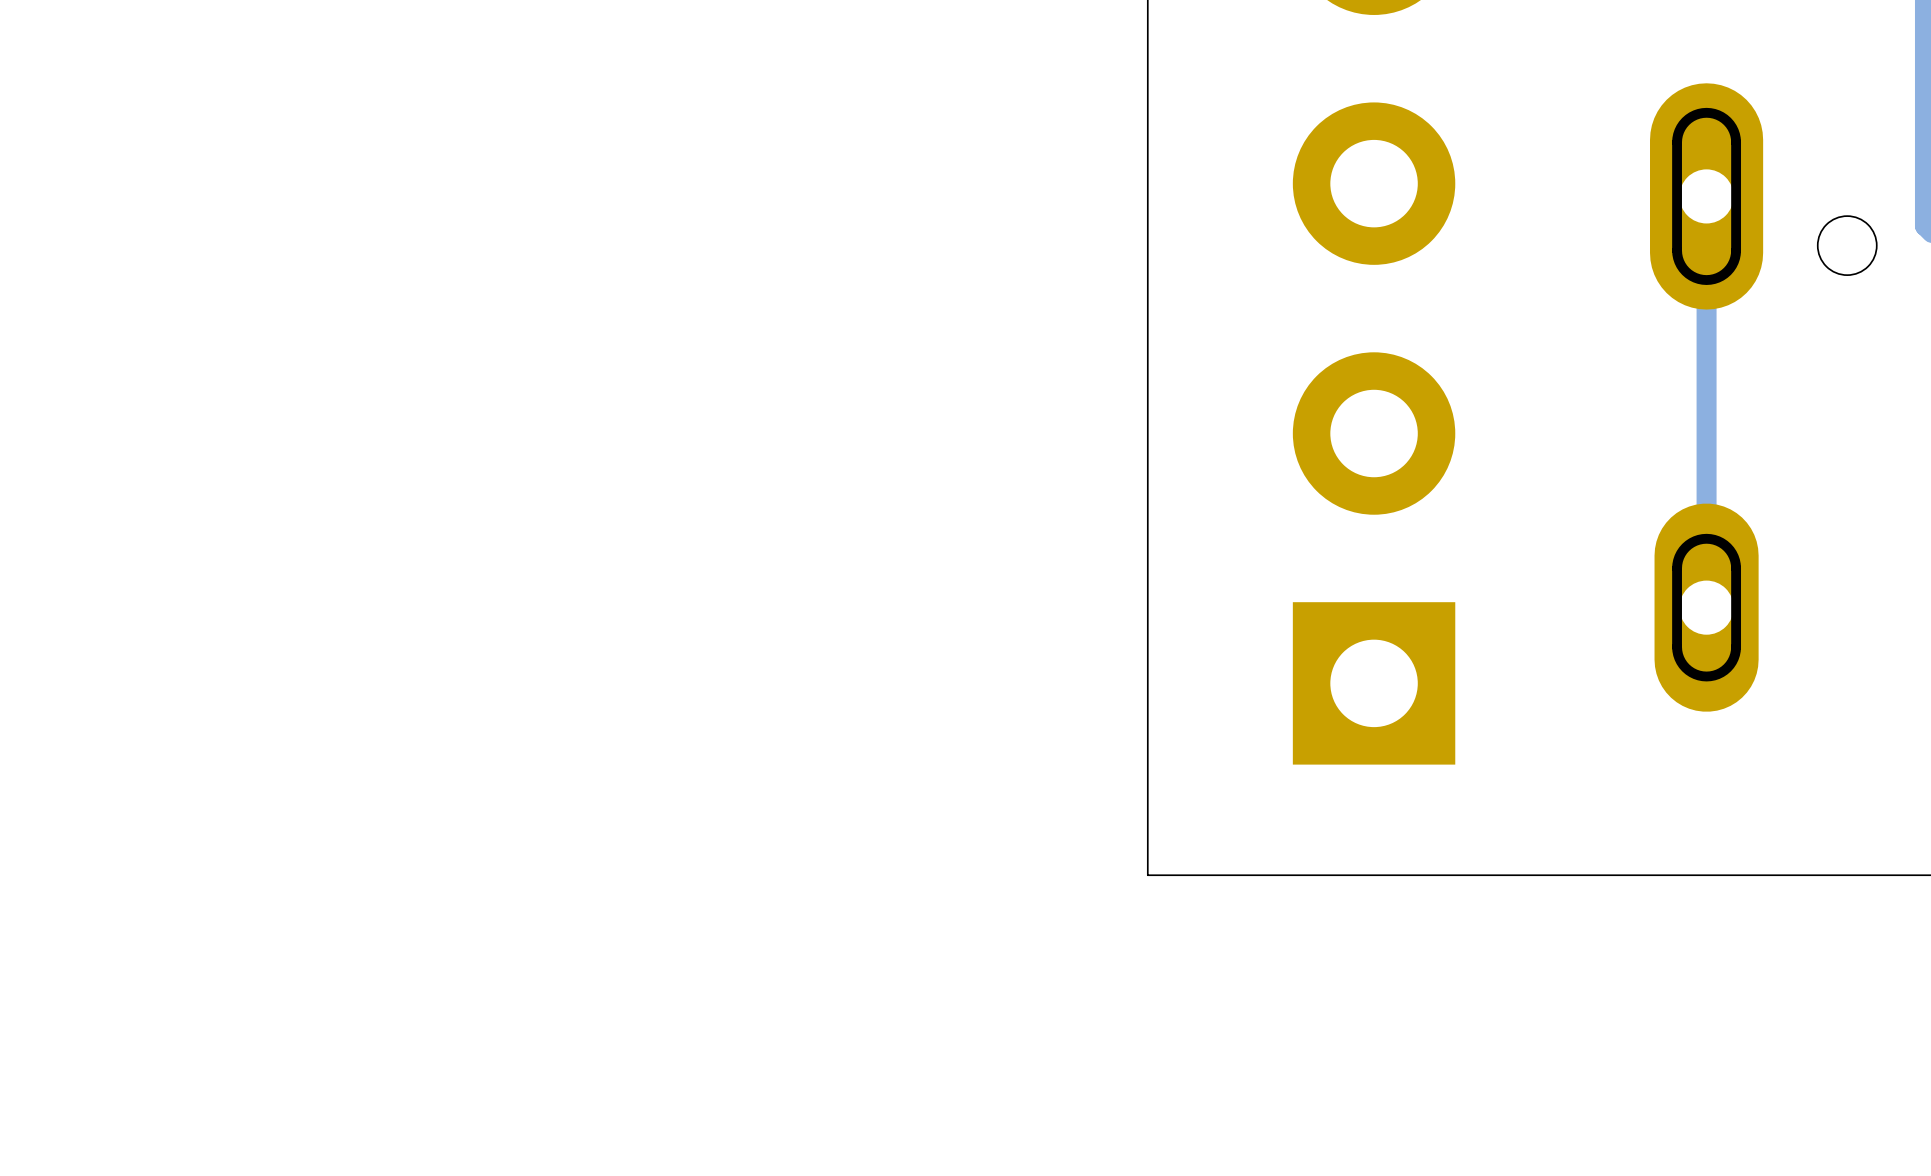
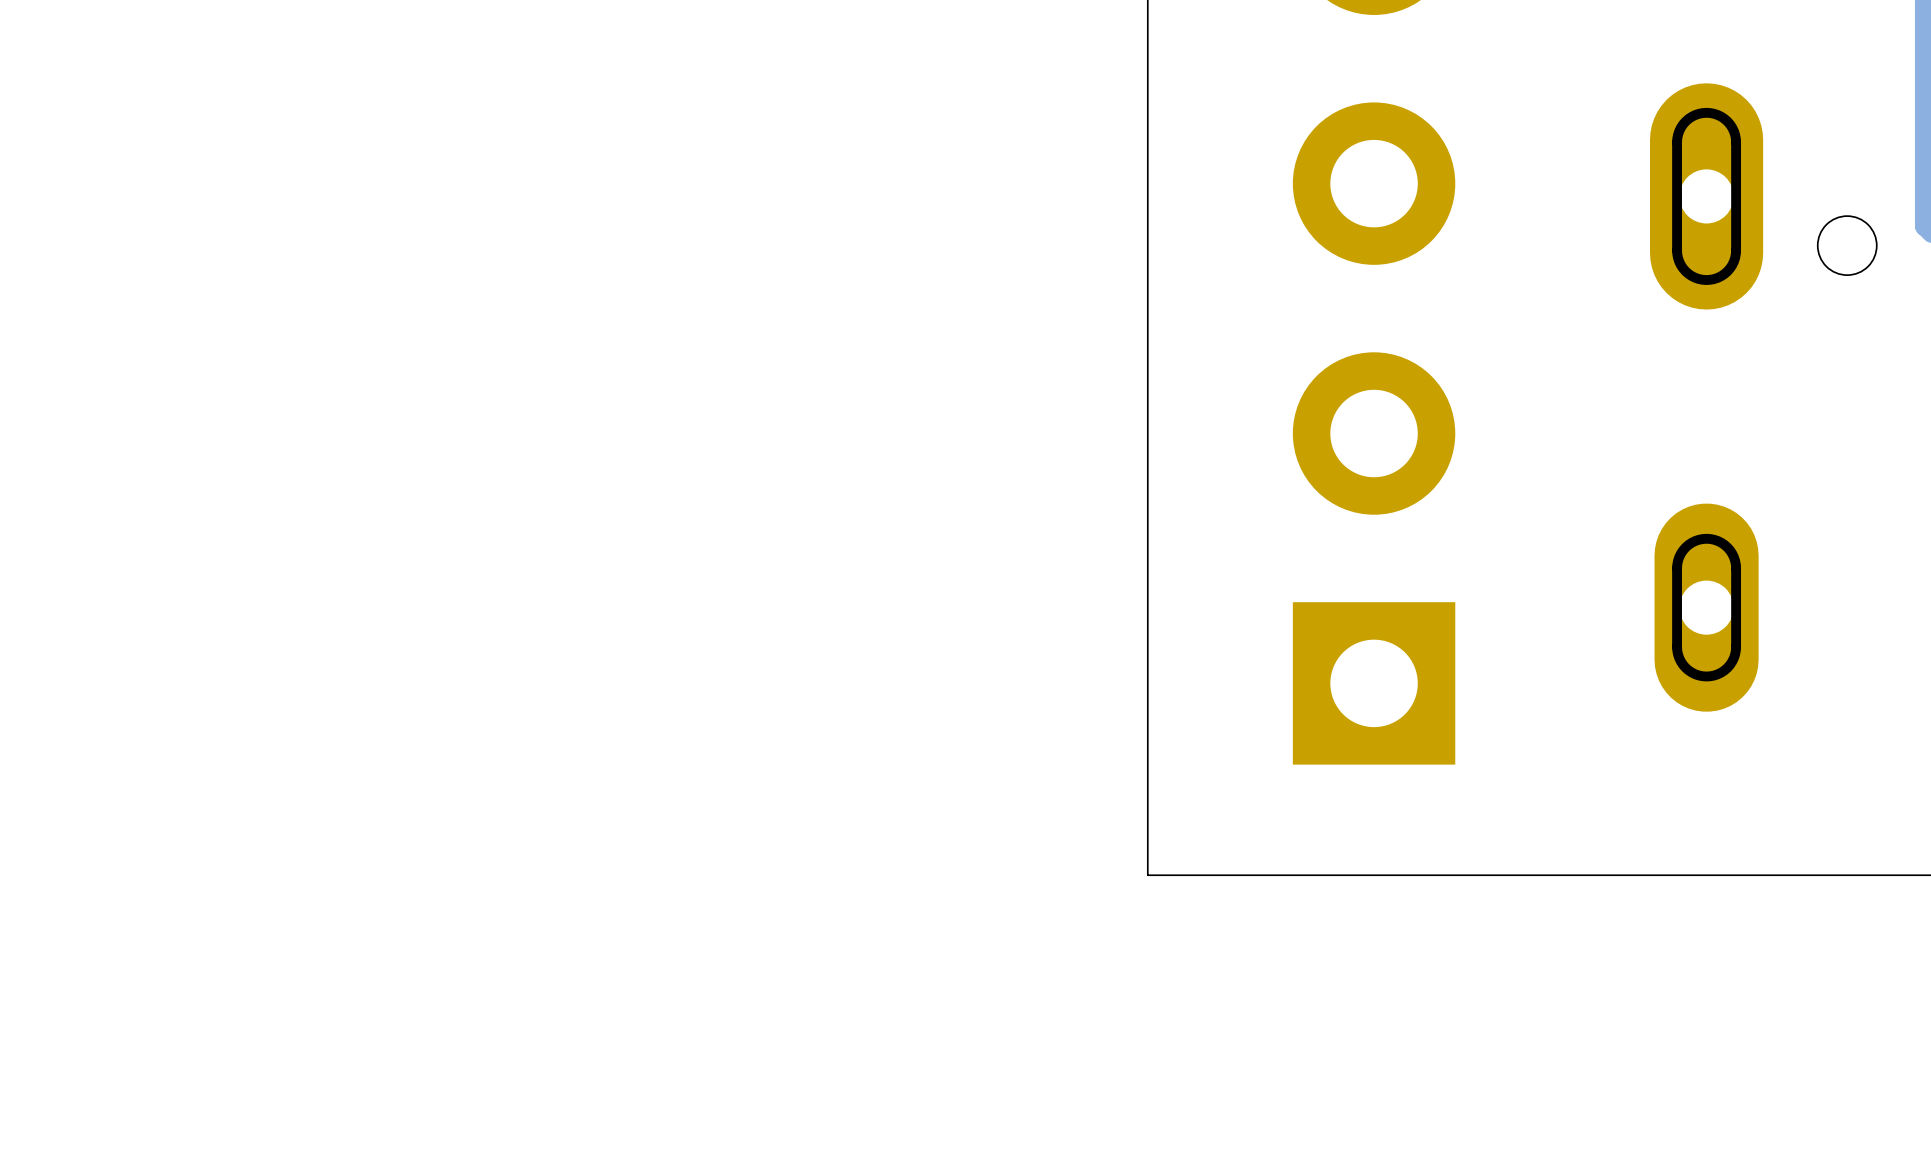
track: (1706, 196) (1706, 607) -> none

